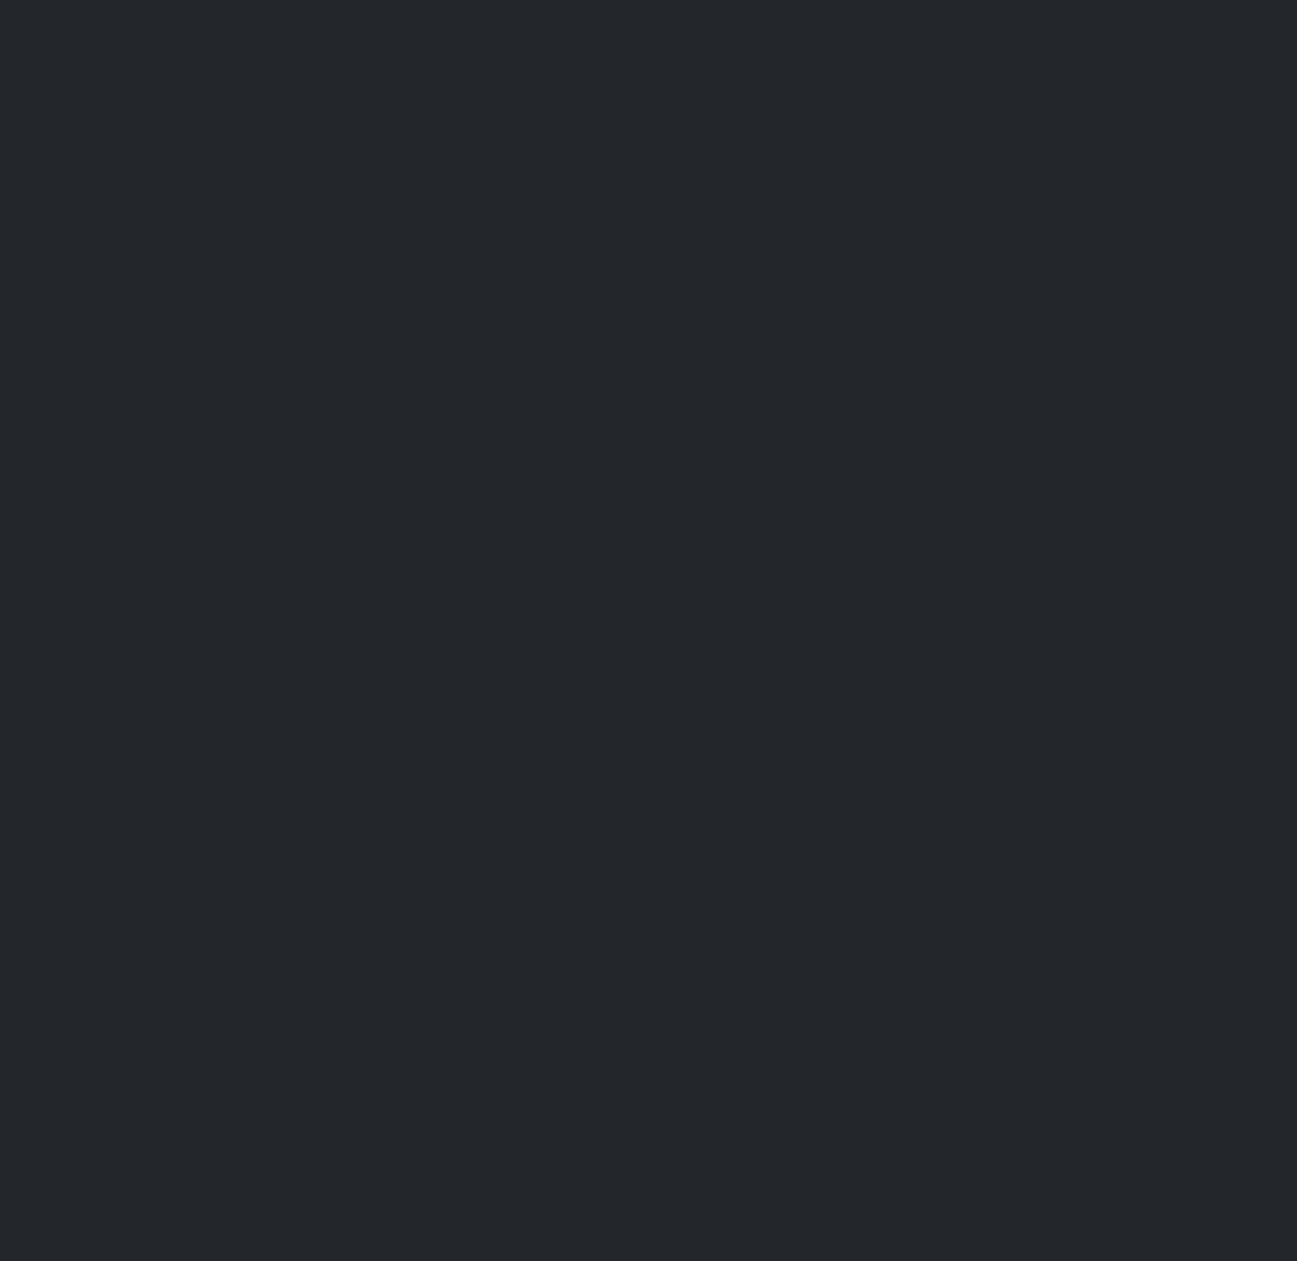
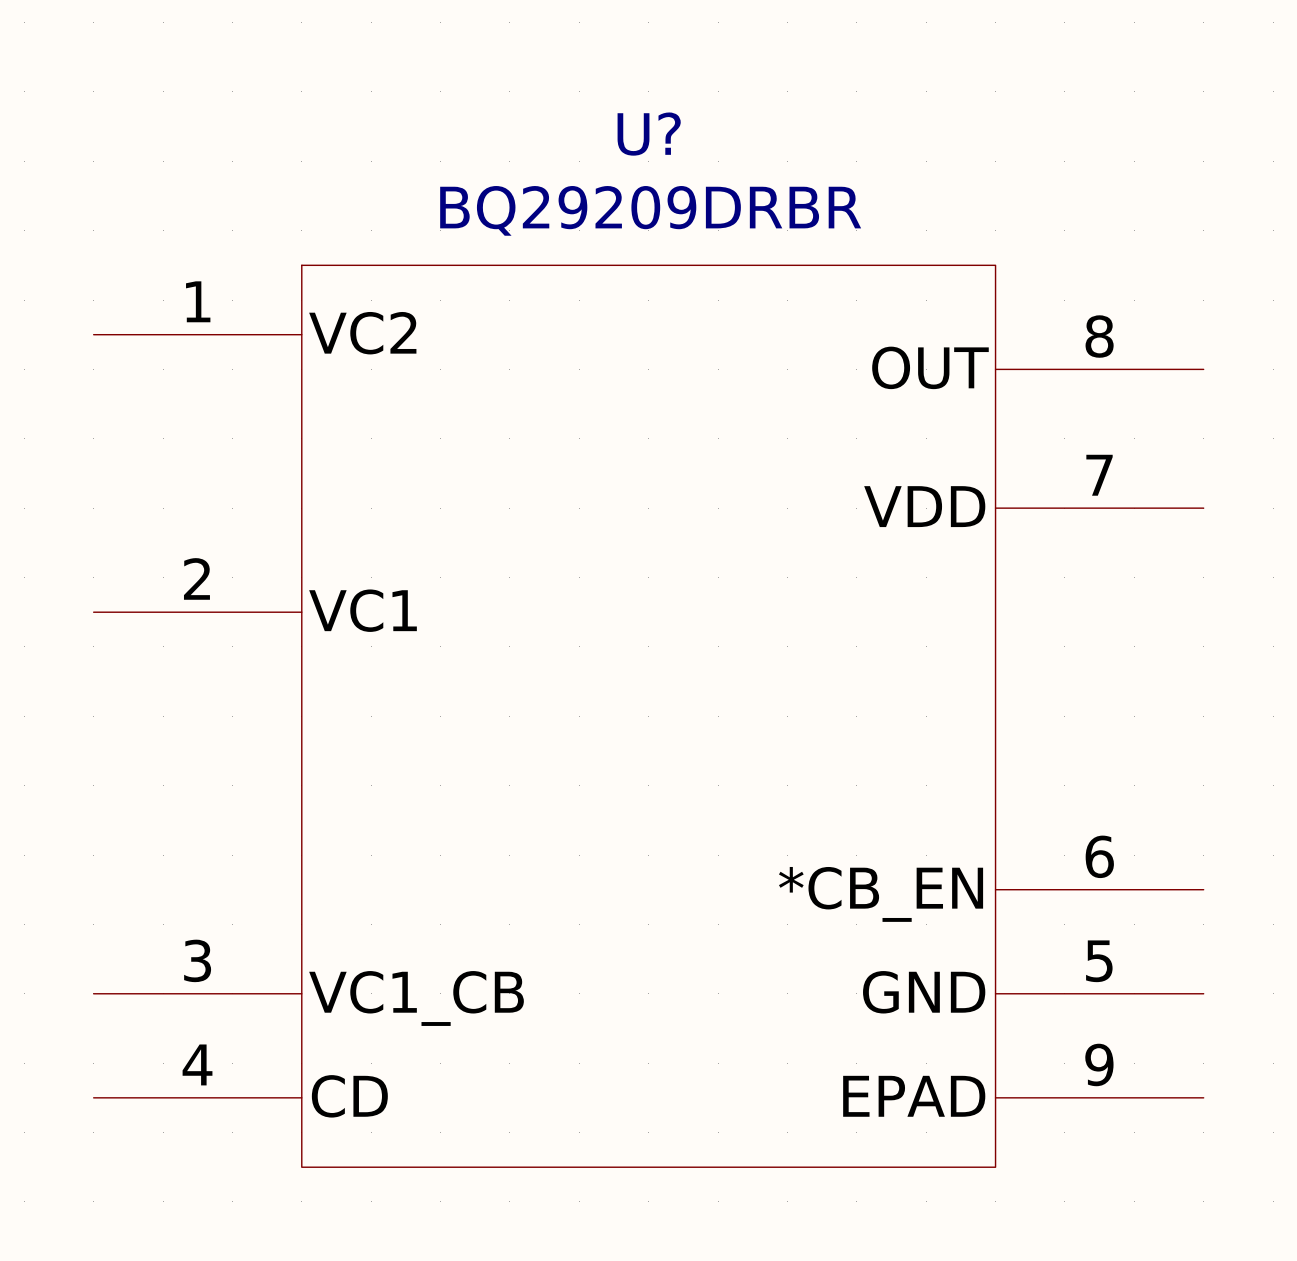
U?: none -> BQ29209DRBR (648, 716)

